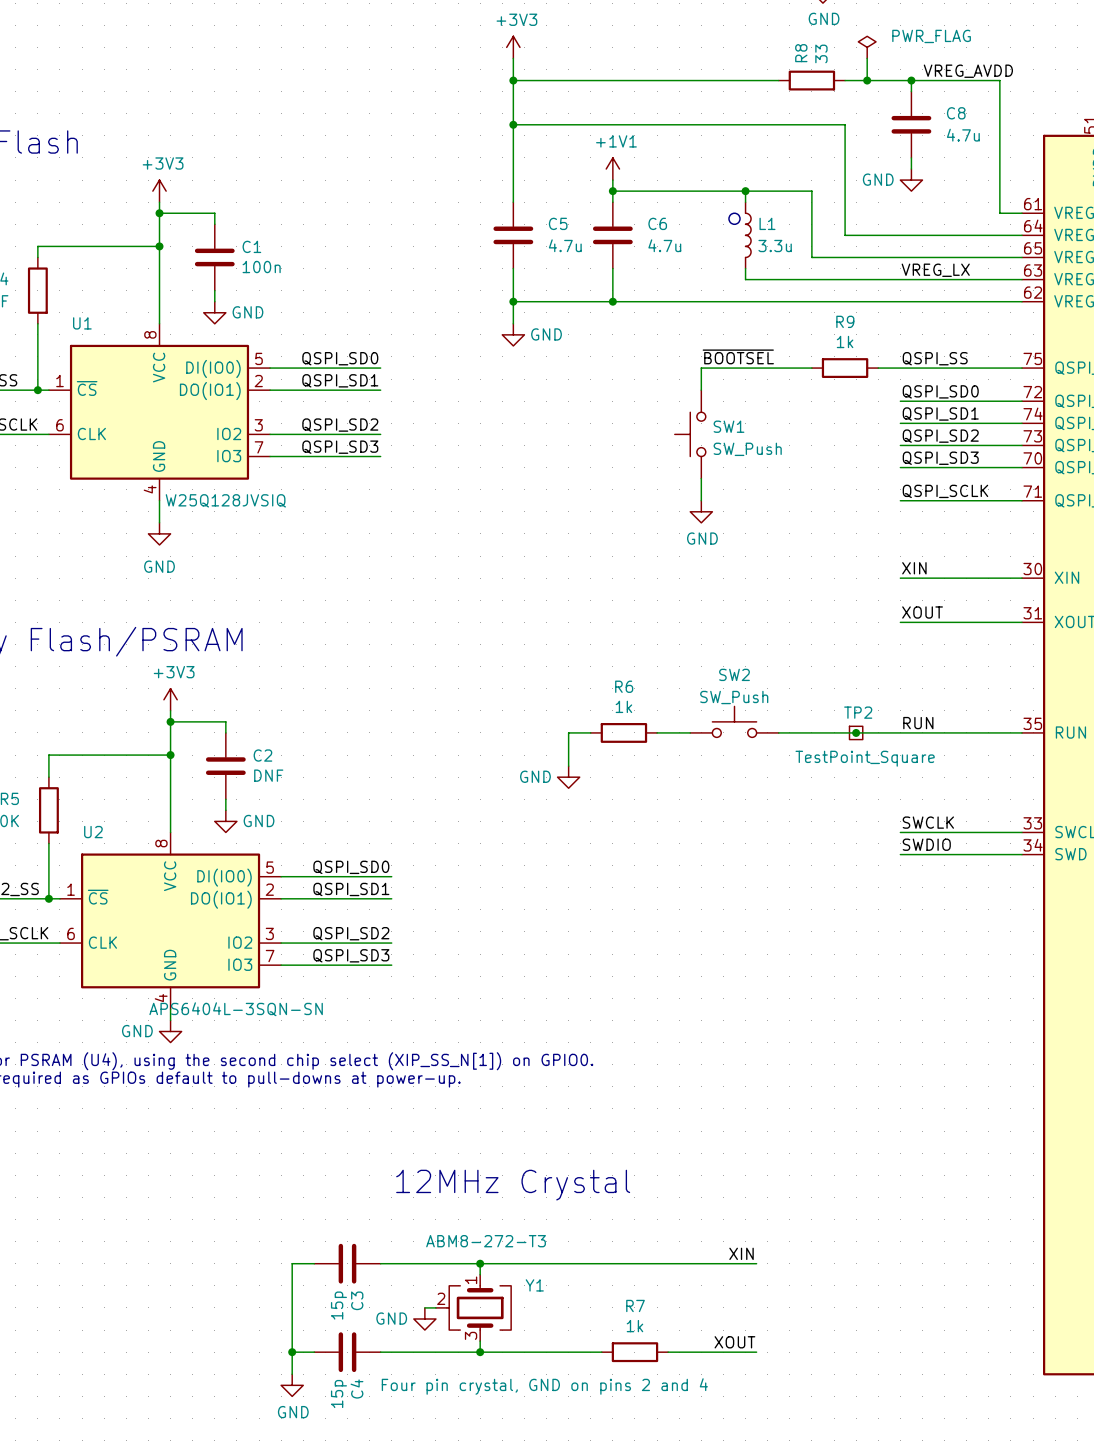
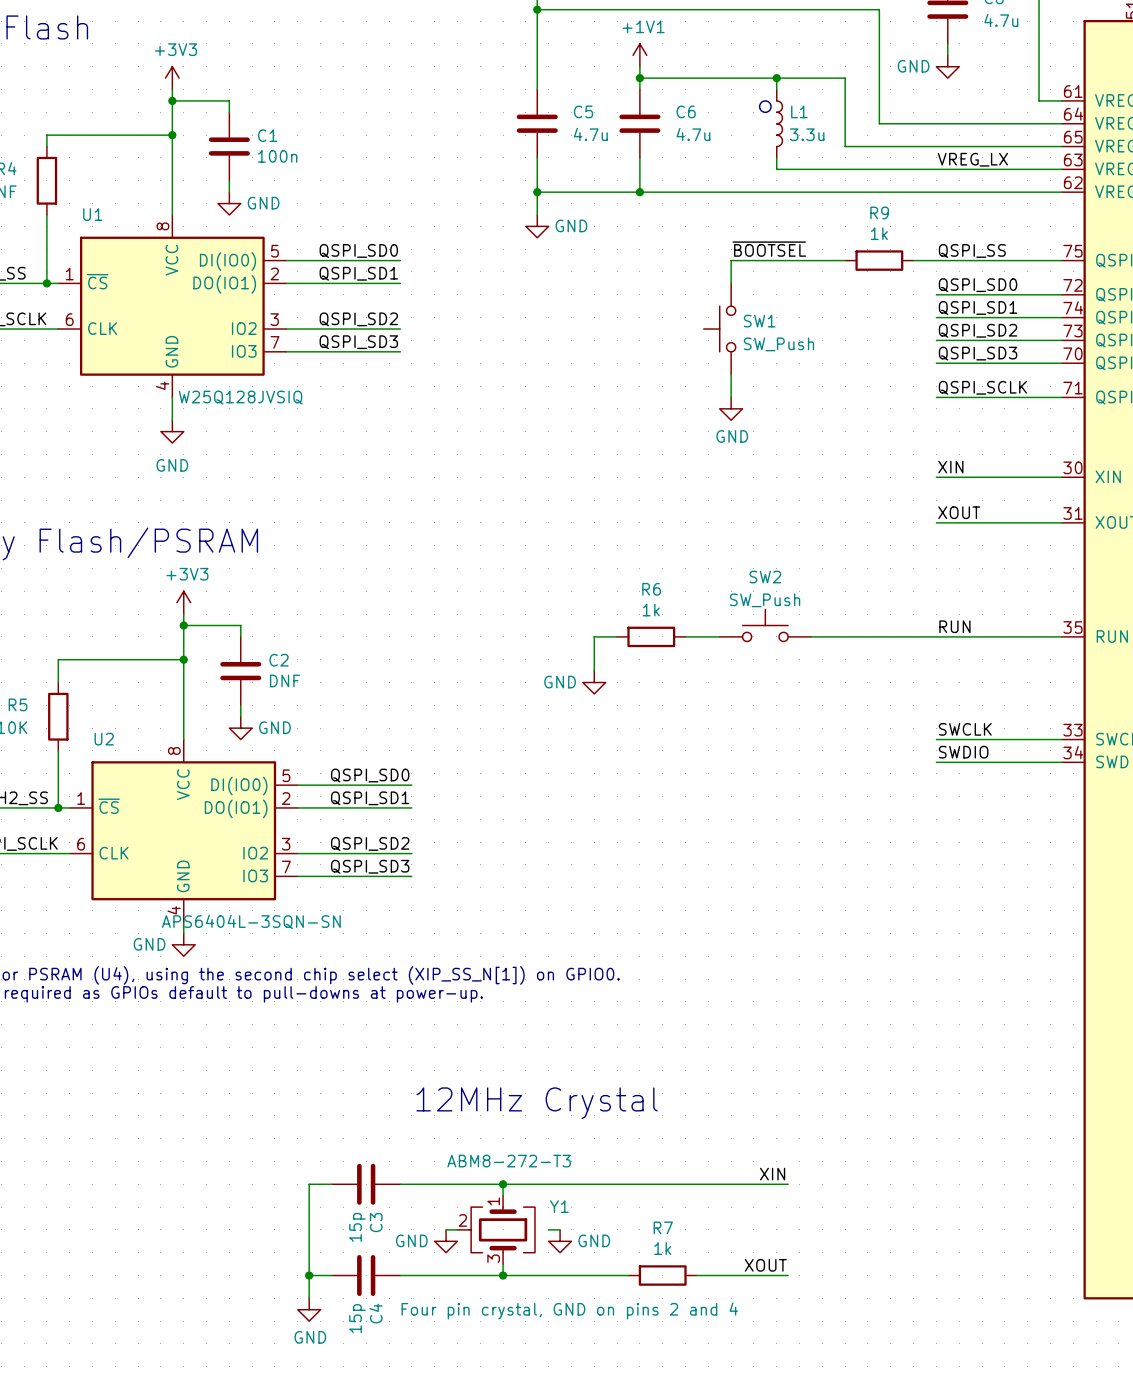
junction: (856, 732) -> none
TP2: TestPoint_Square (856, 732) -> none
wire: none -> (548, 1229) (560, 1229)
power symbol: none -> GND (560, 1241)

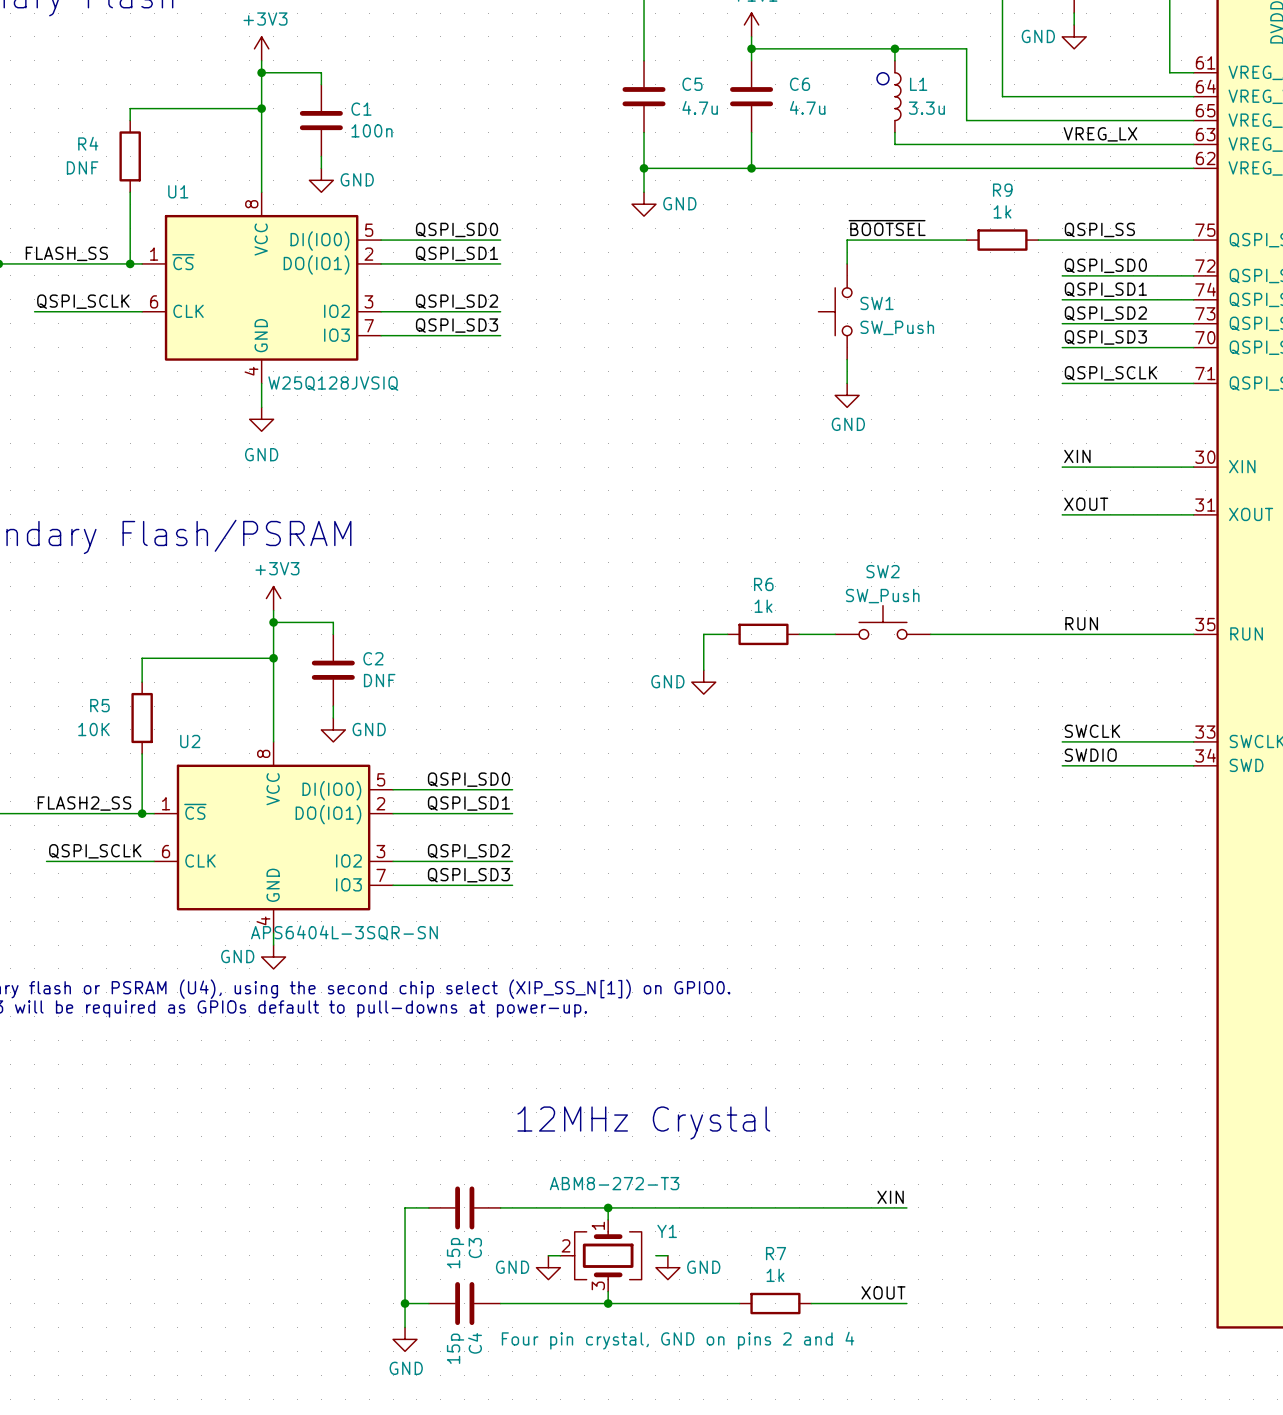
U2 value: APS6404L-3SQN-SN (251, 921) -> APS6404L-3SQR-SN (344, 932)

